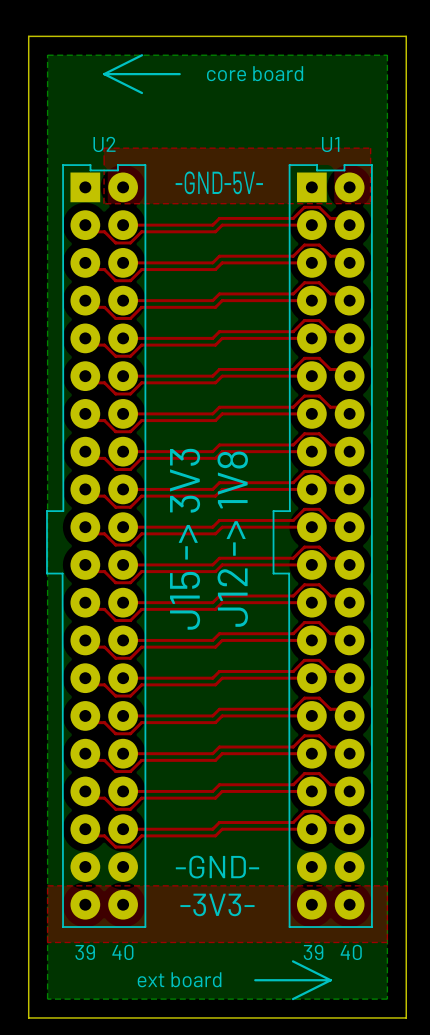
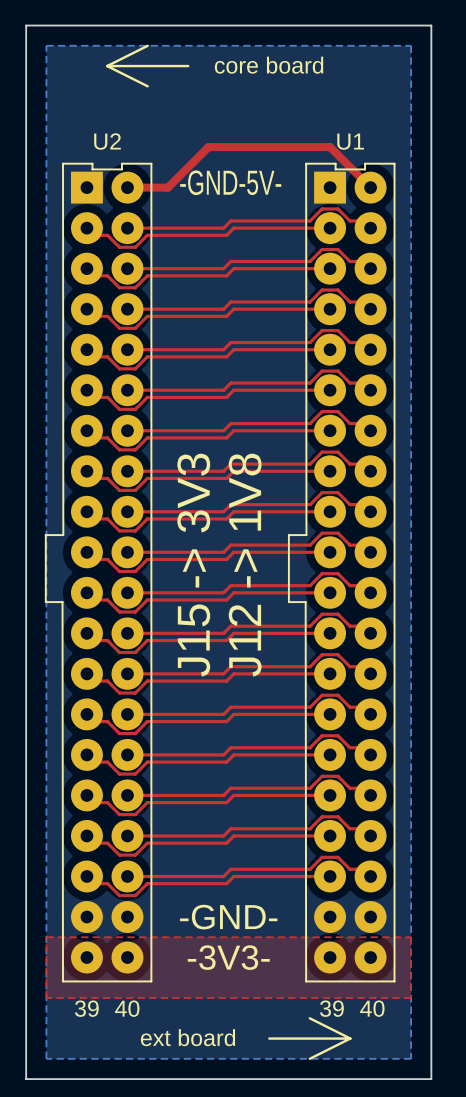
top zone outline: (103, 148) (370, 148) (370, 203) (103, 203) (103, 148) -> none
top track: none -> (127, 187) (167, 187) (208, 147) (330, 147) (370, 187)

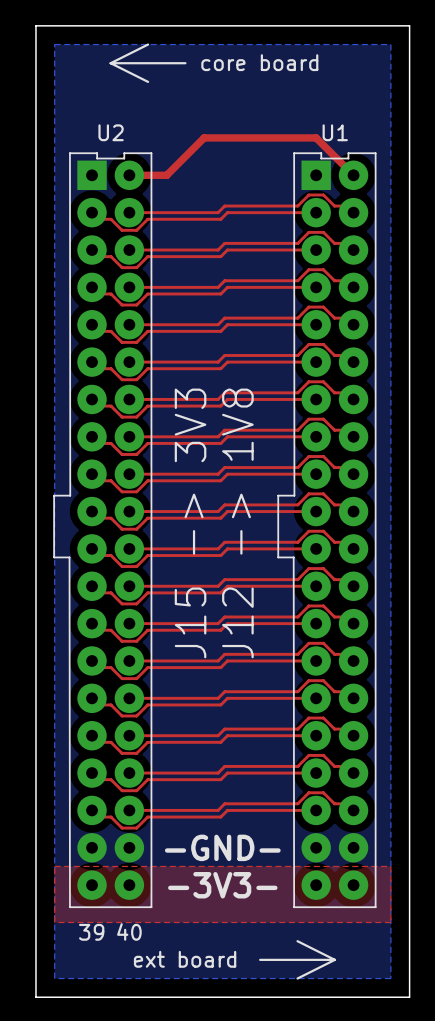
text: -GND-5V- (230, 182) -> none
text: 39 (331, 1008) -> none
text: 40 (372, 1008) -> none

